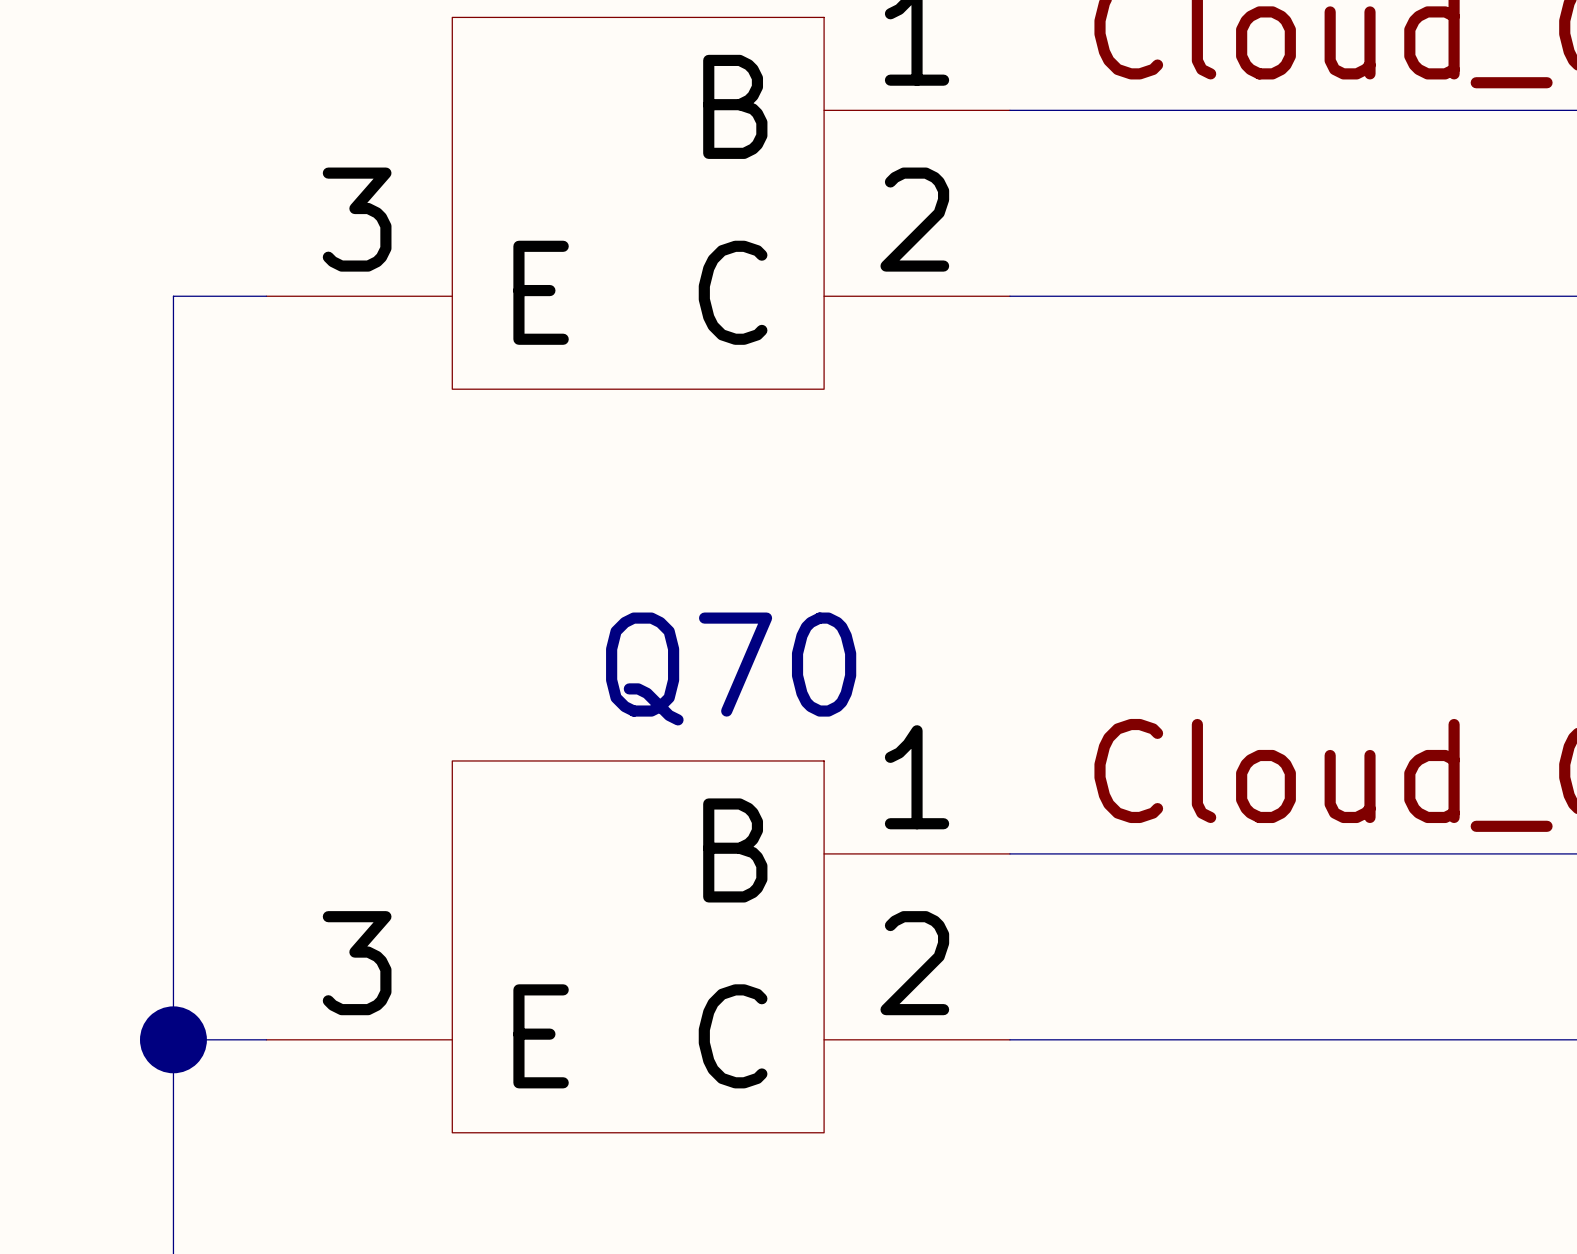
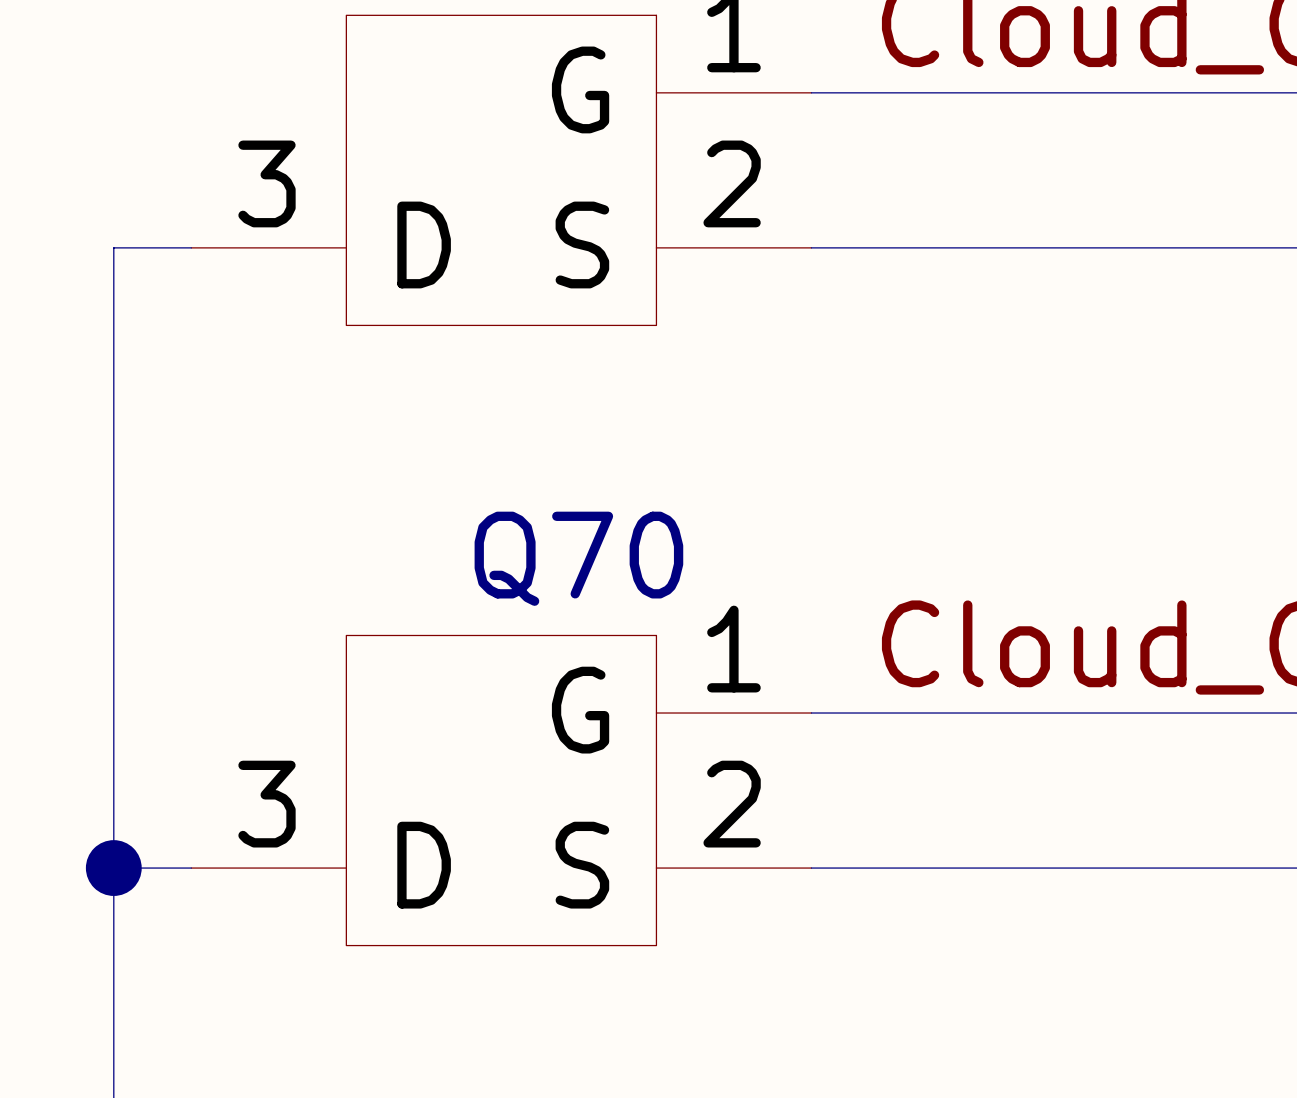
part pin name: B (735, 106) -> G (580, 89)
part pin name: E (541, 292) -> D (424, 244)
part pin name: C (733, 292) -> S (582, 244)
Q70 pin name: B (735, 850) -> G (580, 710)
Q70 pin name: E (541, 1036) -> D (424, 865)
Q70 pin name: C (733, 1036) -> S (582, 865)

